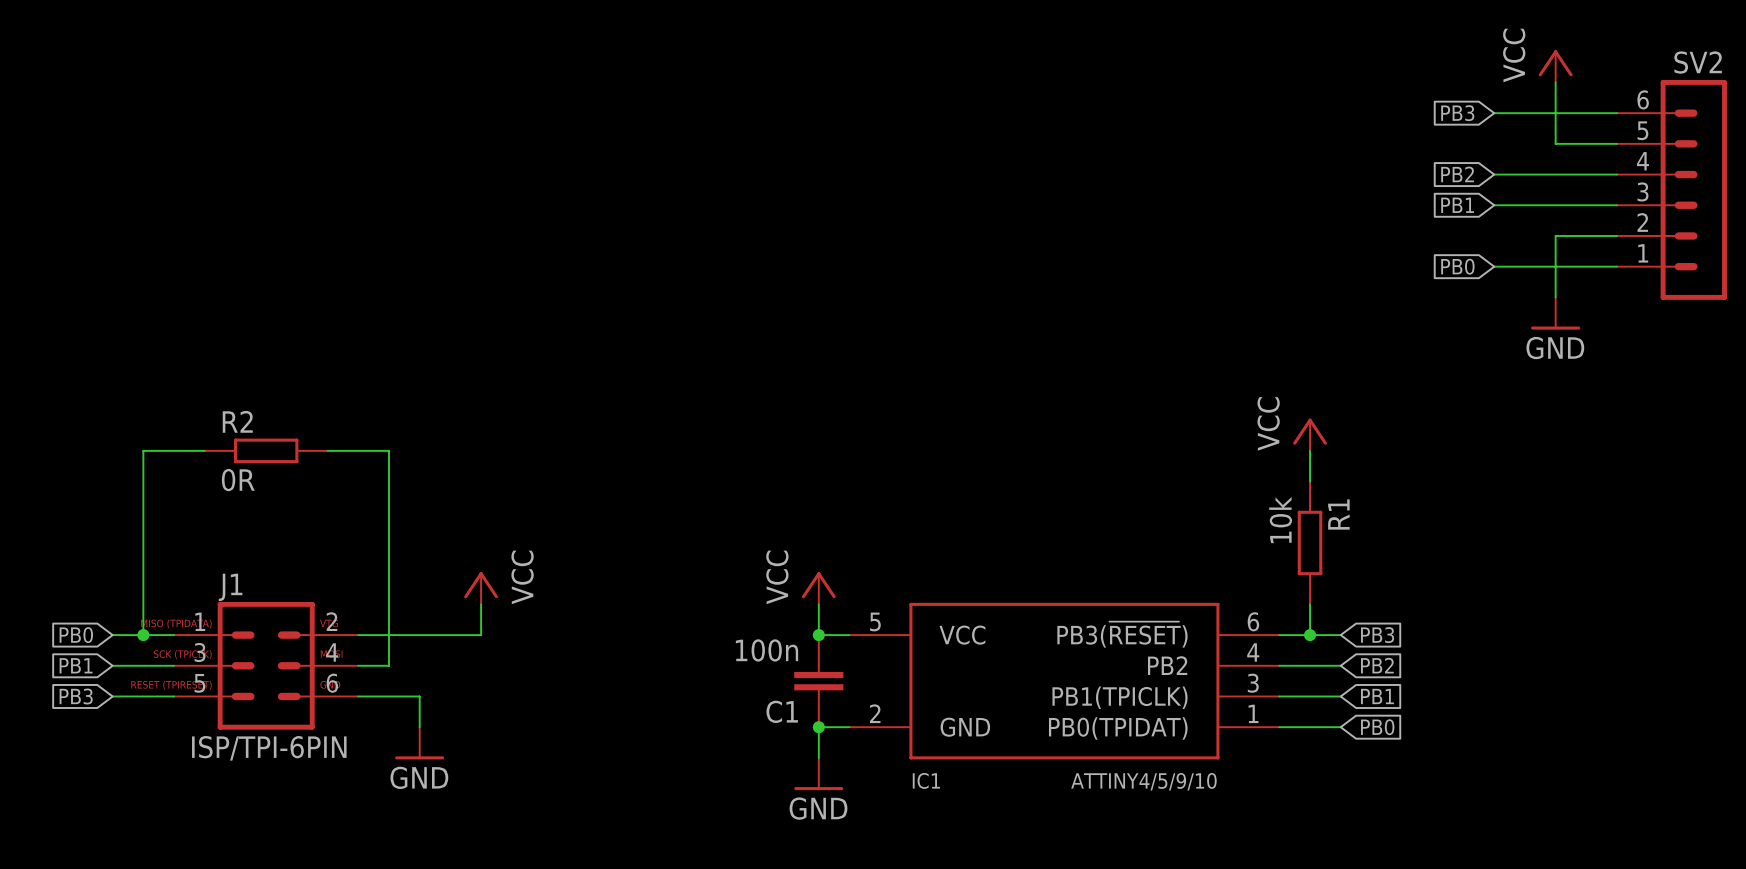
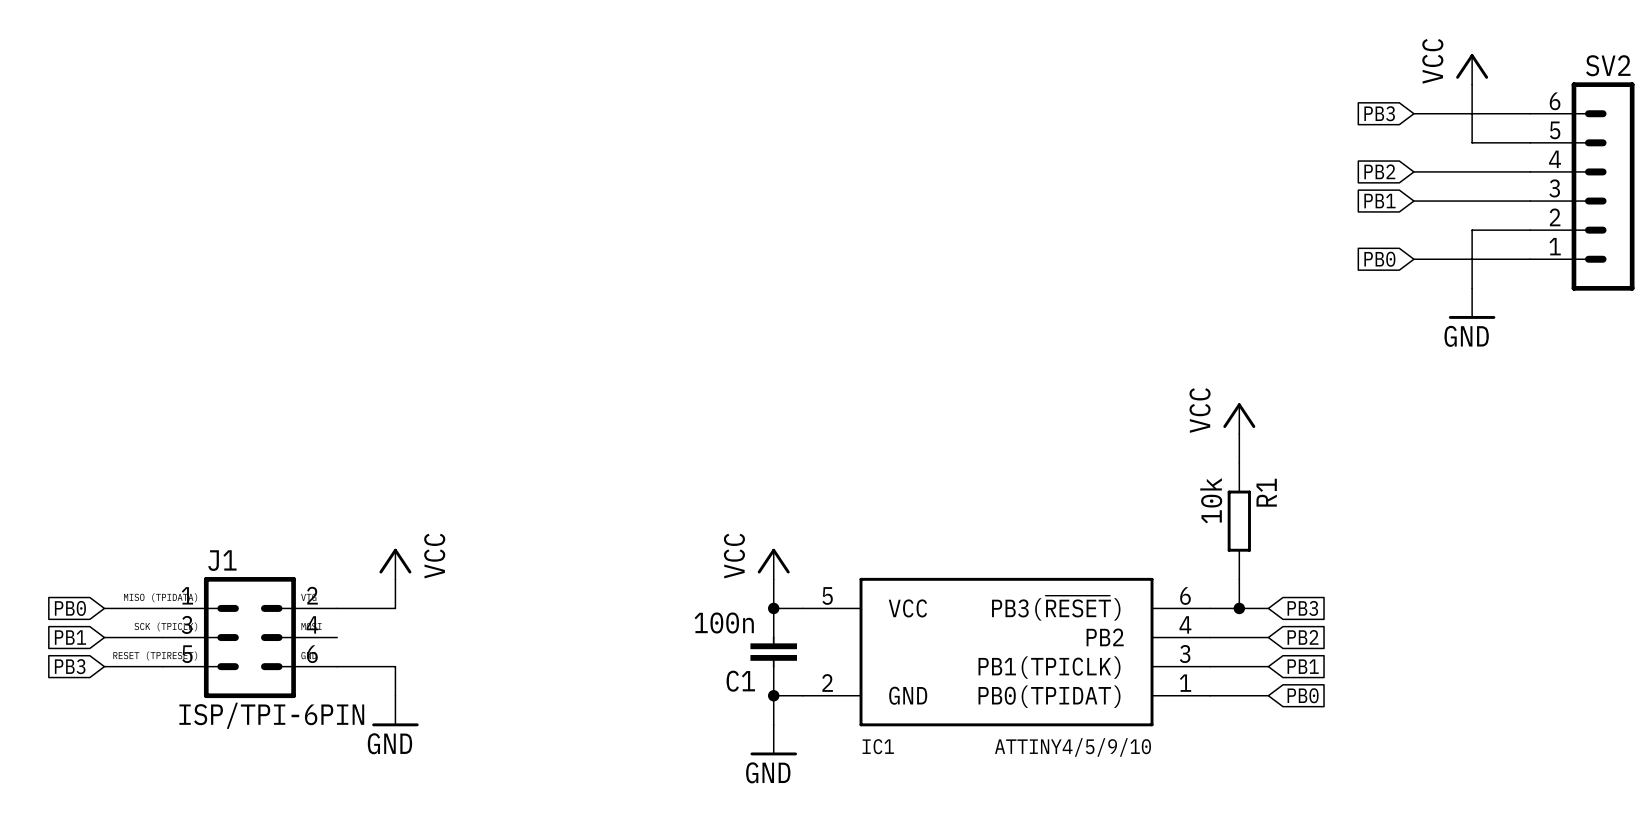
wire: (204, 450) (143, 450) (143, 635) -> none
R2: 0R (266, 450) -> none
wire: (327, 450) (388, 450) (388, 665) (358, 665) -> none
power symbol position: VCC (481, 588) -> VCC (395, 564)
wire: (481, 604) (481, 635) (419, 635) -> (395, 579) (395, 608)
junction: (143, 635) -> none

